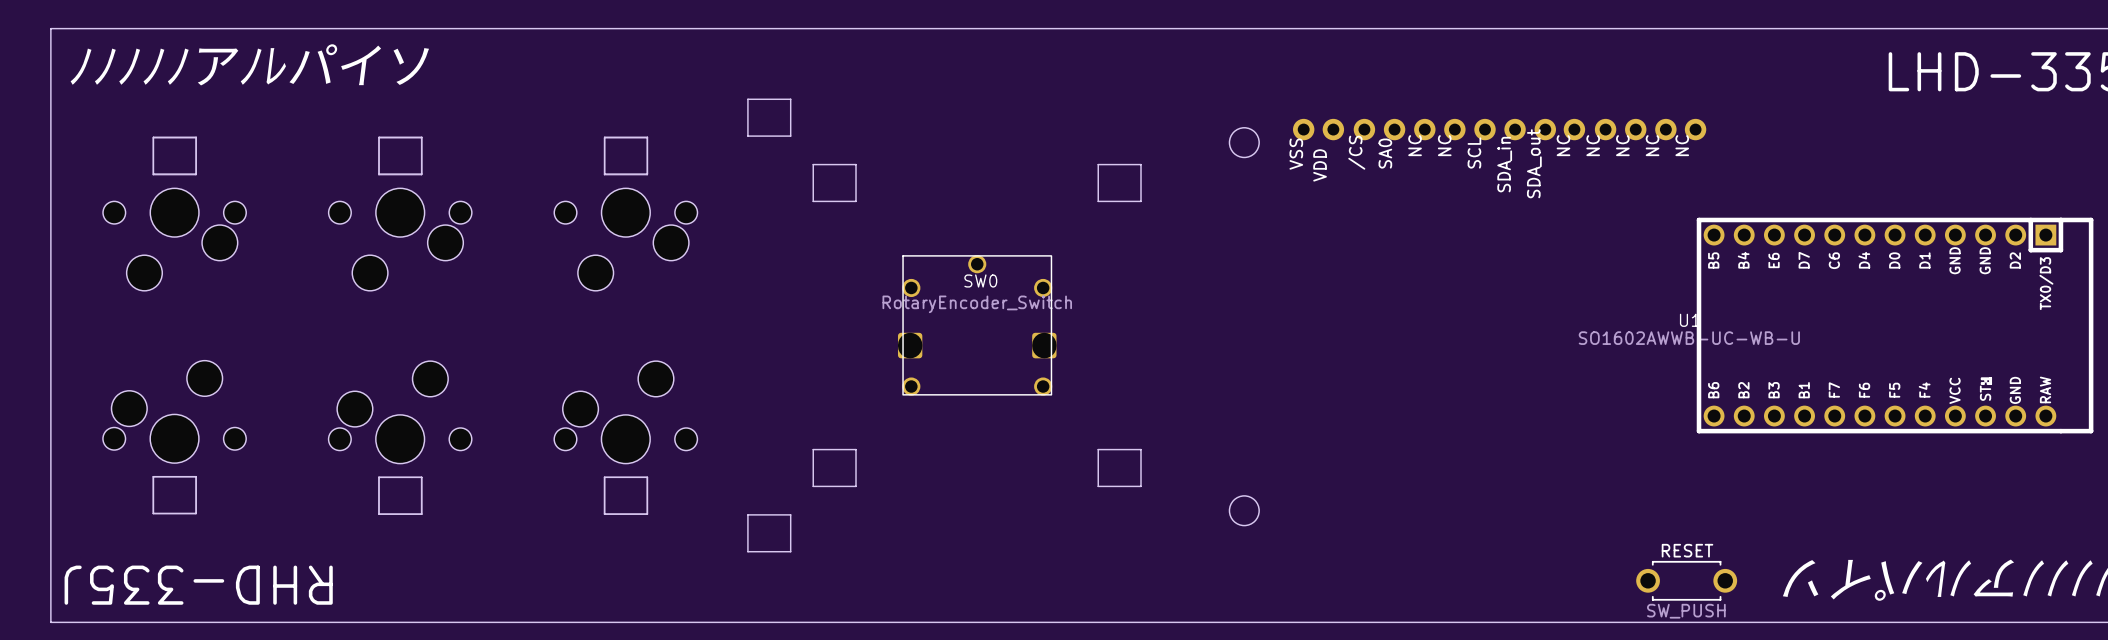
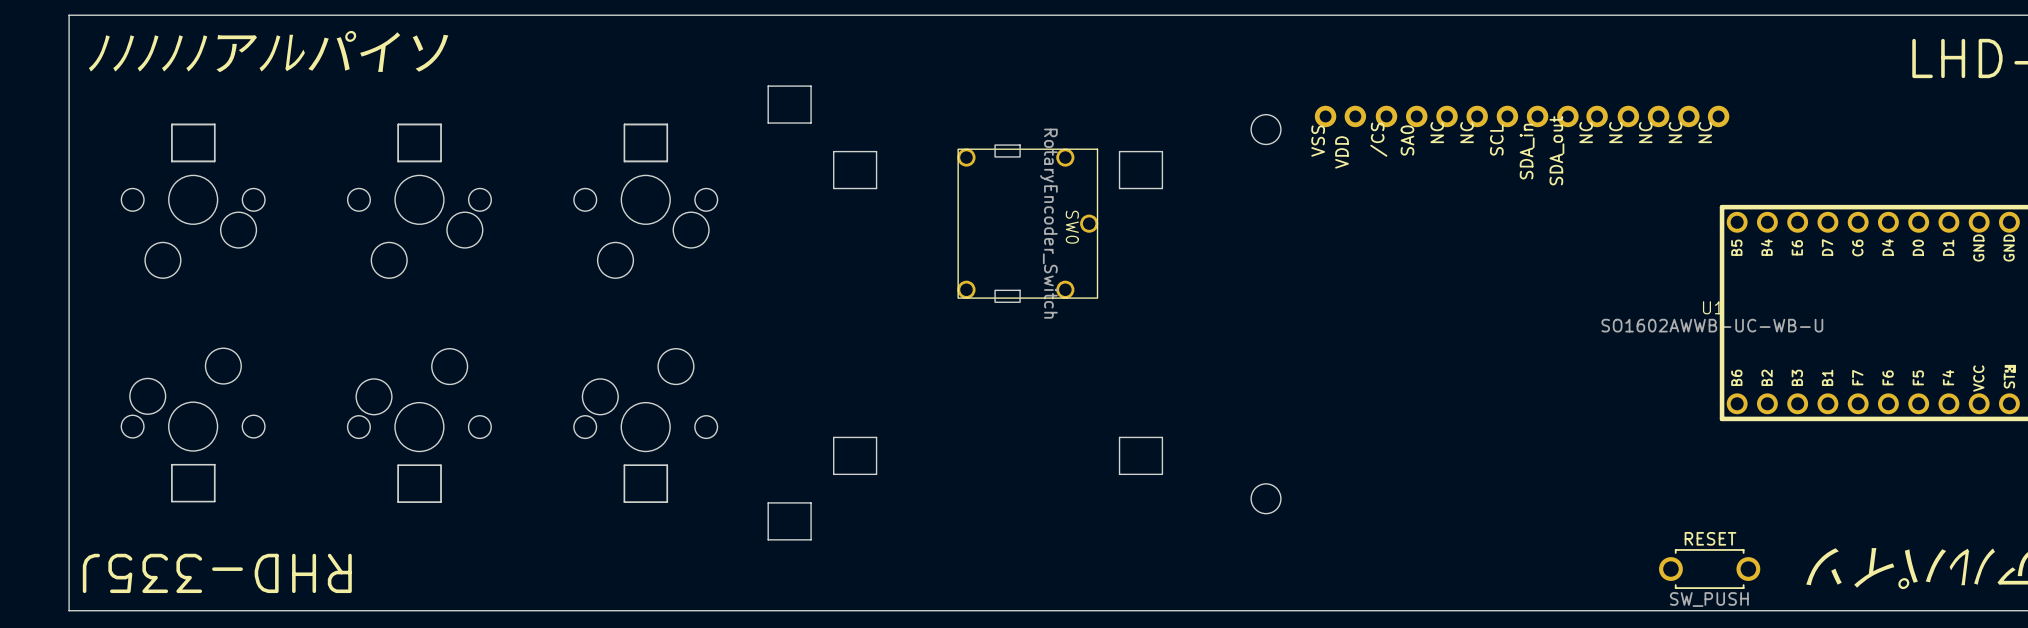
SW0 footprint: [897, 255, 1057, 396] -> [957, 144, 1099, 303]
SW0 name position: SW0 (980, 280) -> SW0 (1072, 227)
SW0 value position: RotaryEncoder_Switch (977, 304) -> RotaryEncoder_Switch (1048, 223)

